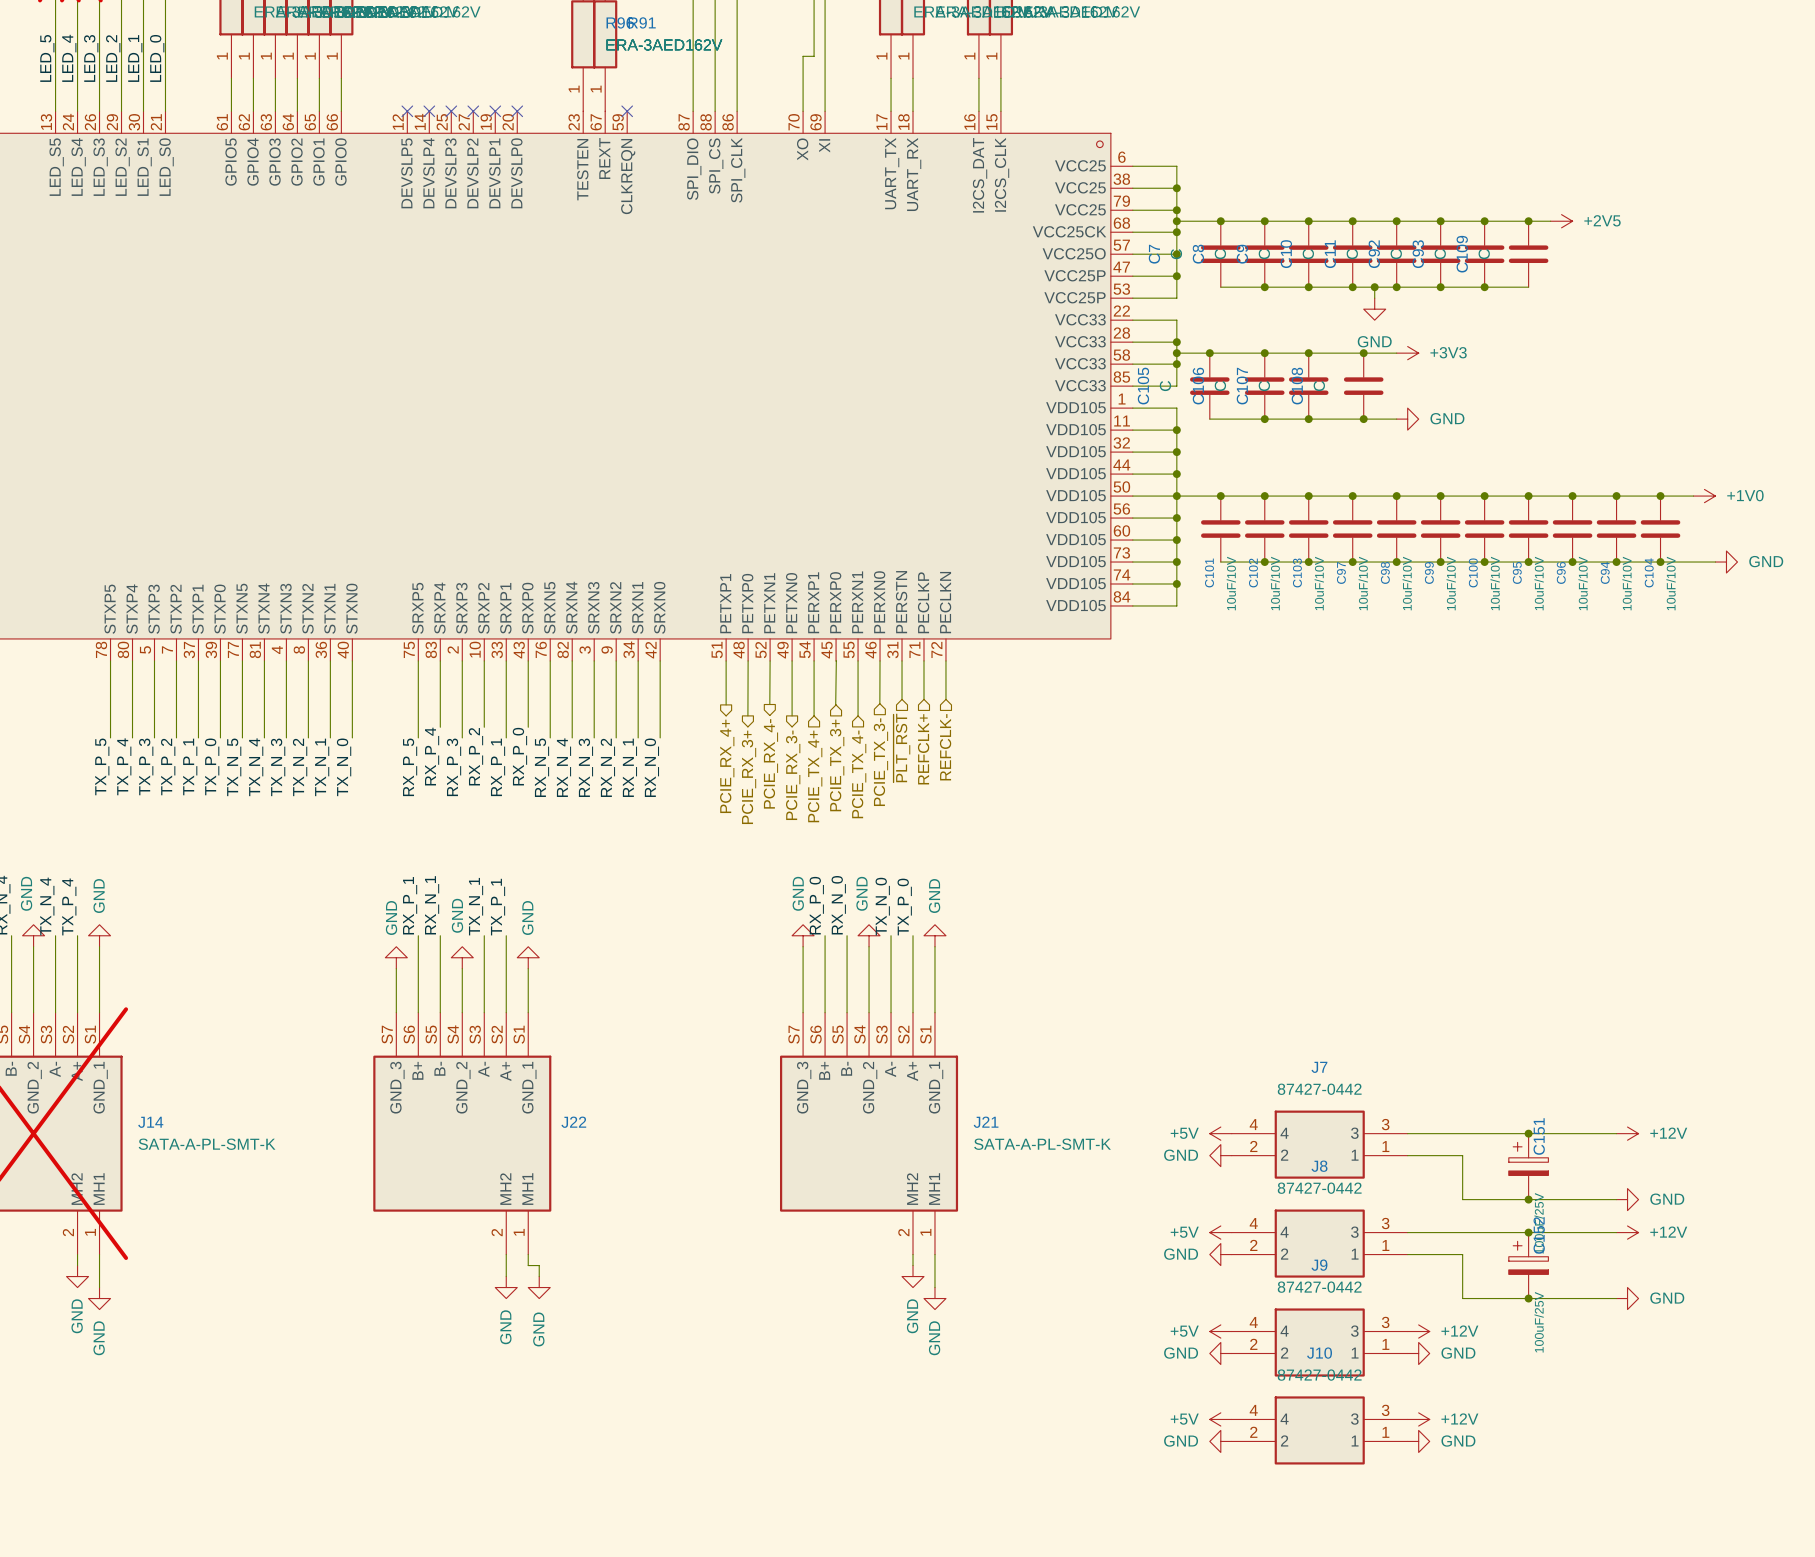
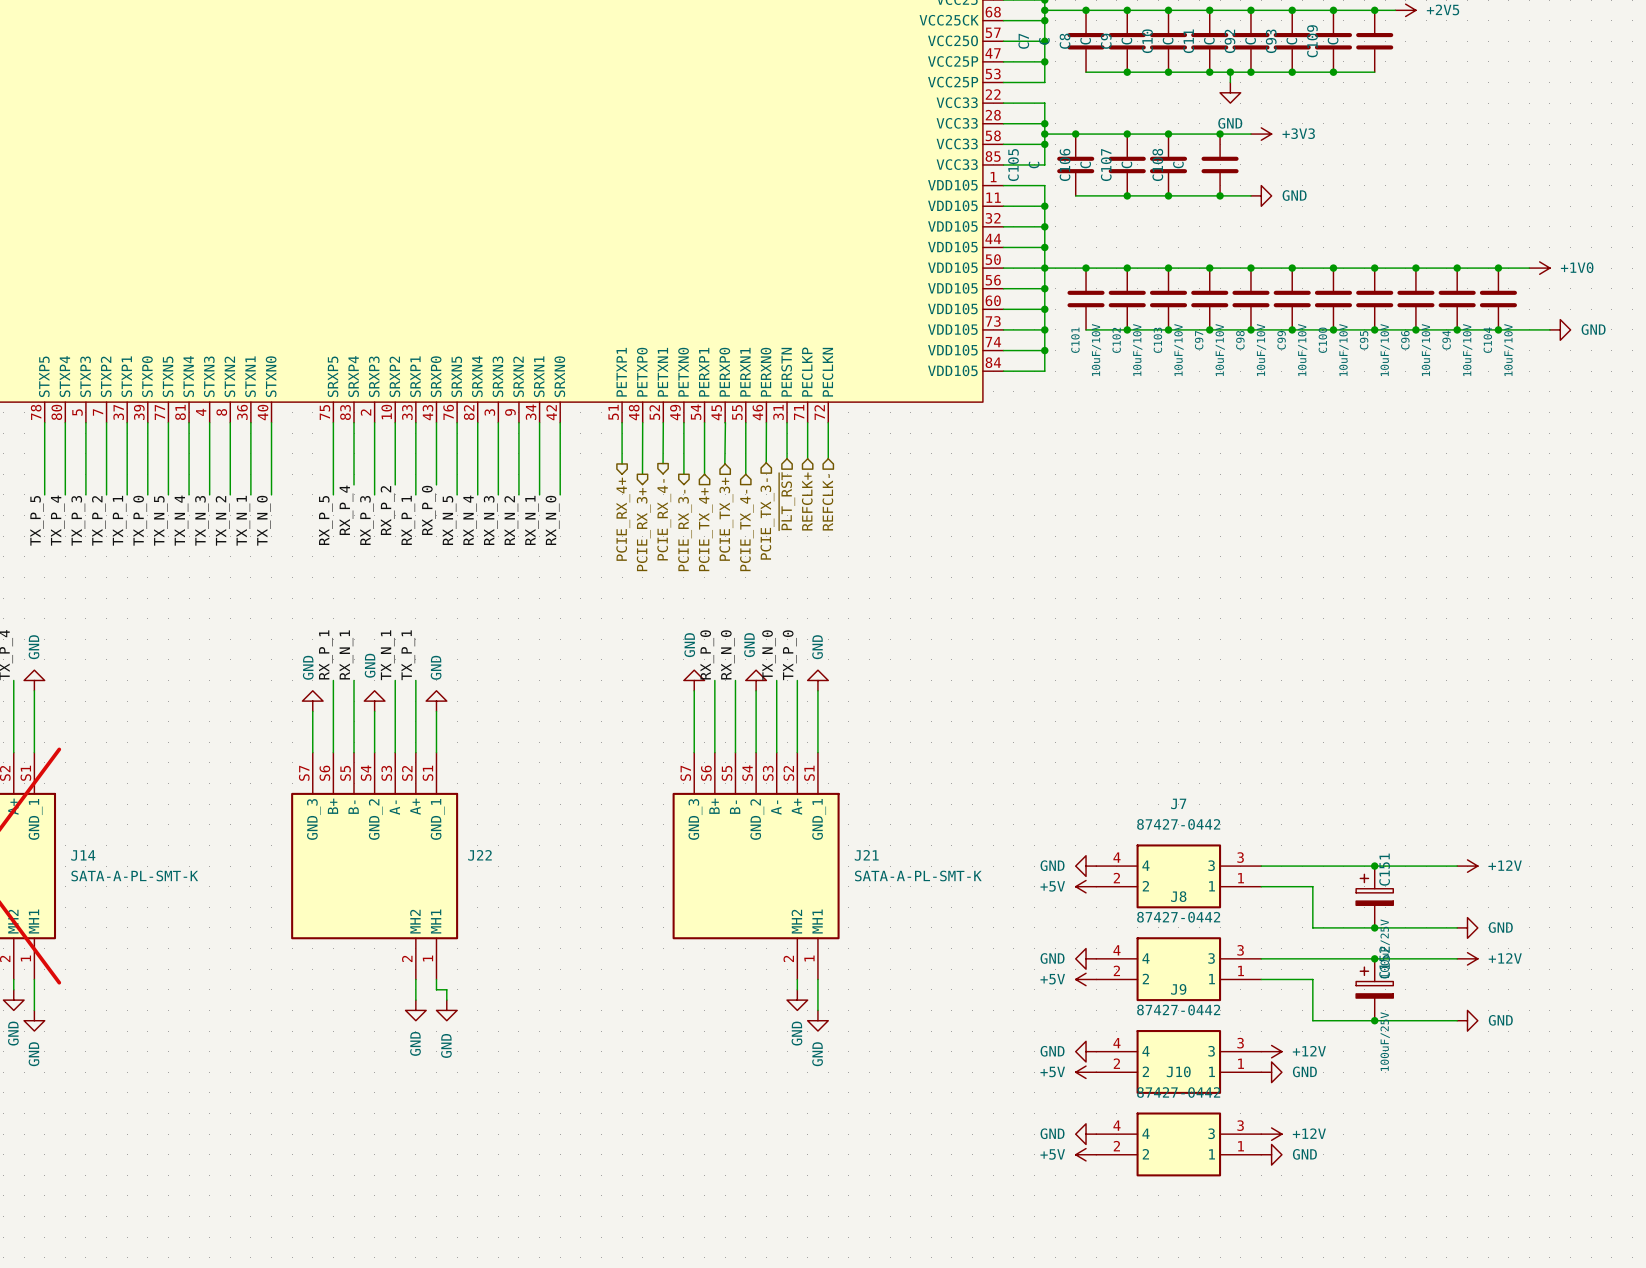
power symbol: +5V (1220, 1133) -> GND (1086, 866)
power symbol: GND (1220, 1155) -> +5V (1086, 886)
power symbol: +5V (1220, 1232) -> GND (1086, 958)
power symbol: GND (1220, 1254) -> +5V (1086, 979)
power symbol: +5V (1220, 1331) -> GND (1086, 1051)
power symbol: GND (1220, 1353) -> +5V (1086, 1072)
power symbol: +5V (1220, 1419) -> GND (1086, 1134)
power symbol: GND (1220, 1441) -> +5V (1086, 1154)

